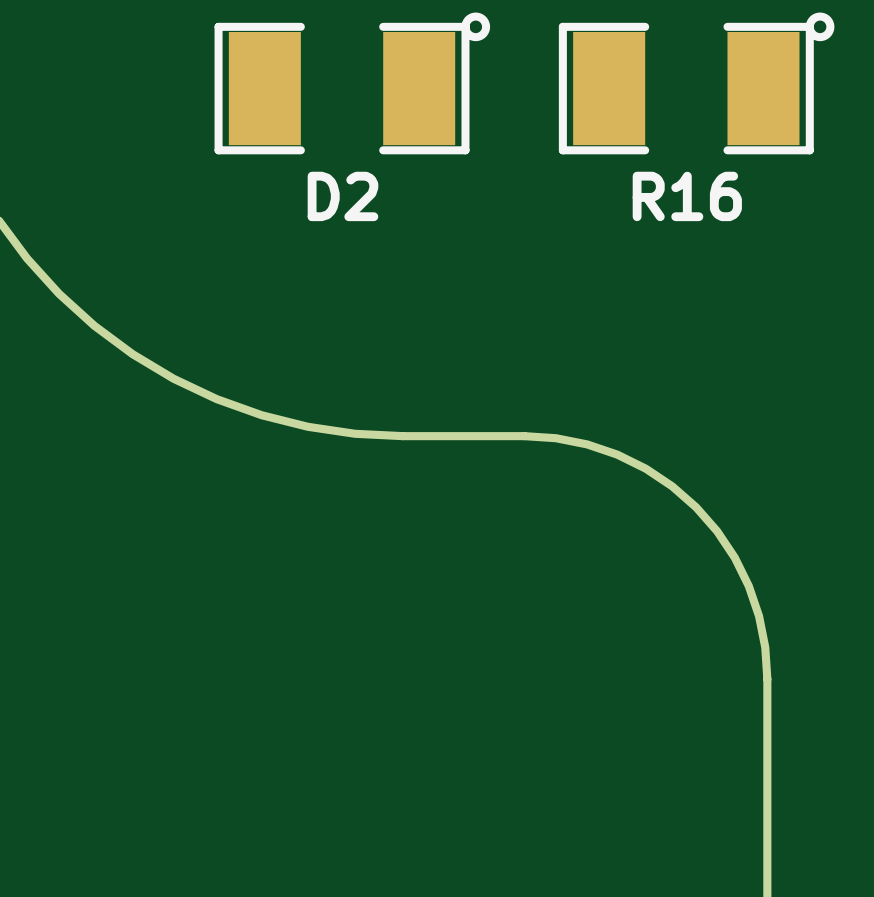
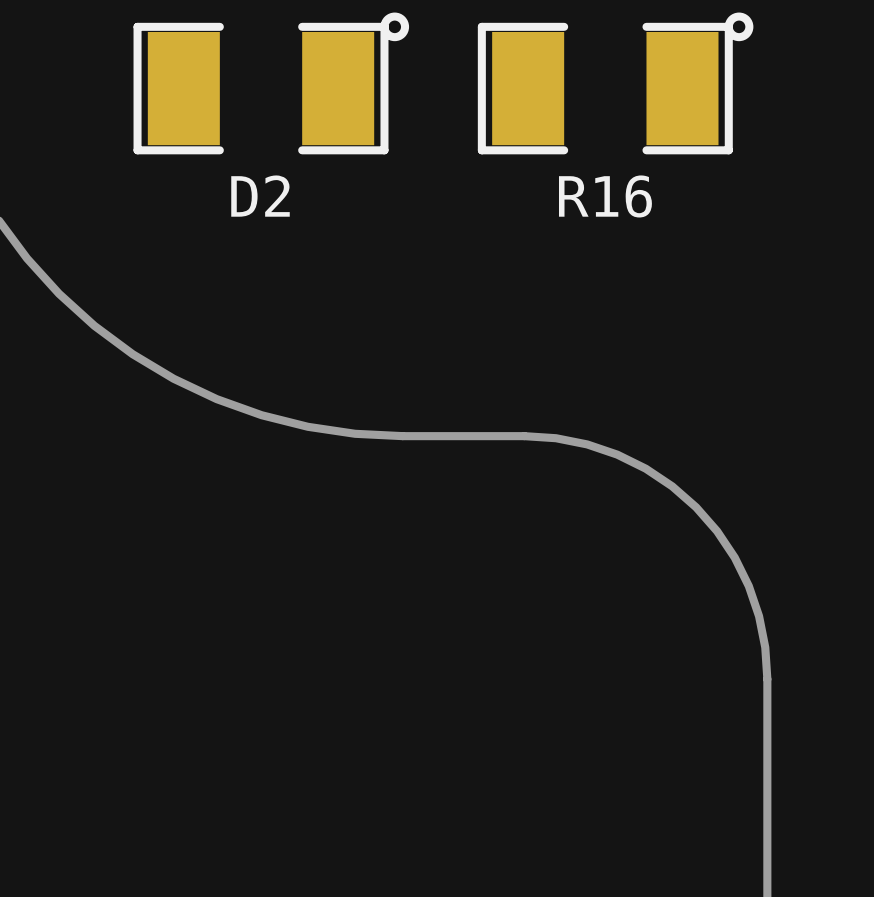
D2 position: (352, 83) -> (271, 83)
R16 position: (696, 83) -> (615, 83)

